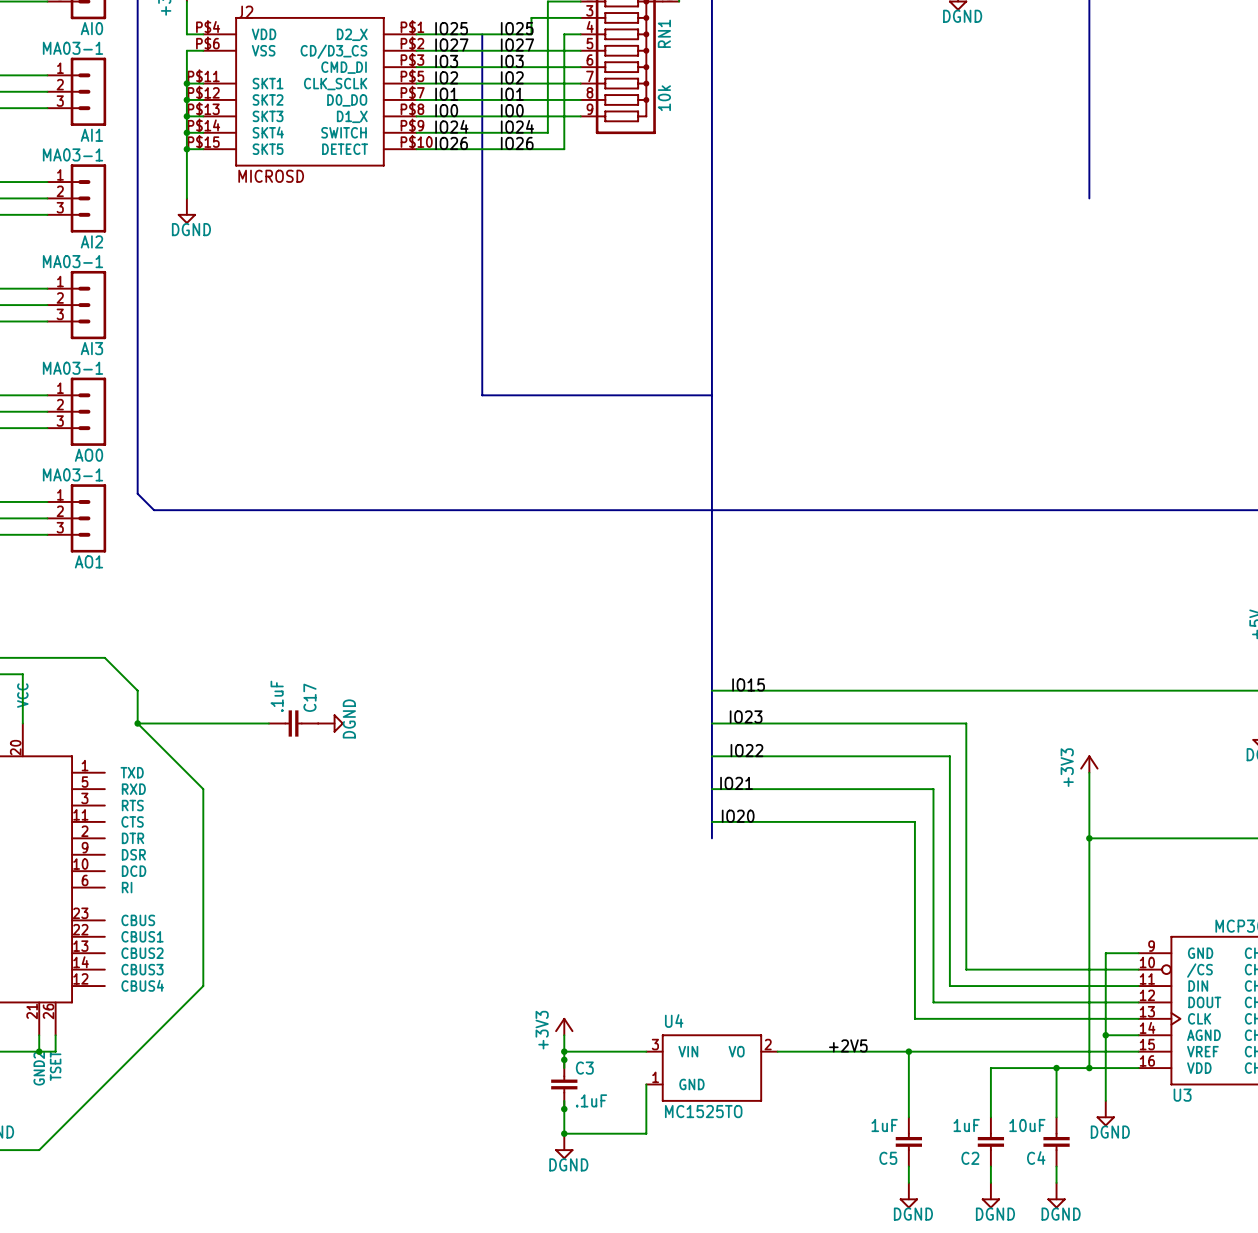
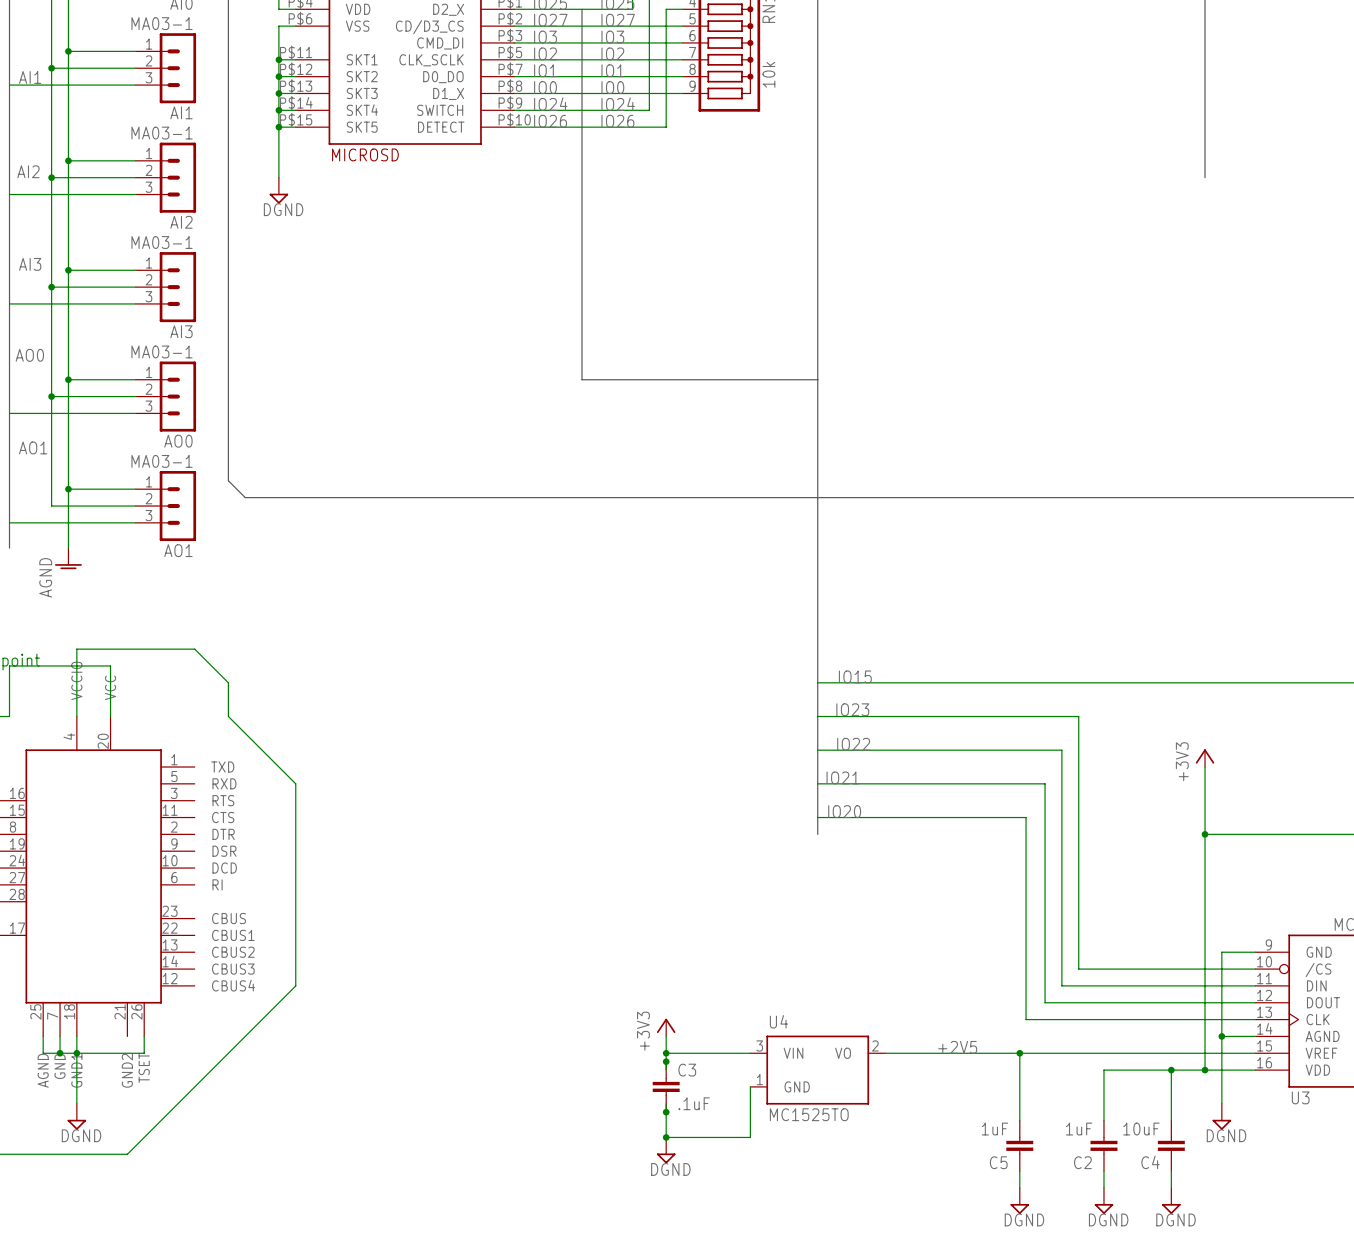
wire: (137, 723) (268, 723) -> none
junction: (137, 723) -> none
C17: .1uF (293, 723) -> none
power symbol: DGND (330, 723) -> none
wire: (39, 1035) (39, 1051) -> none
junction: (39, 1051) -> none

